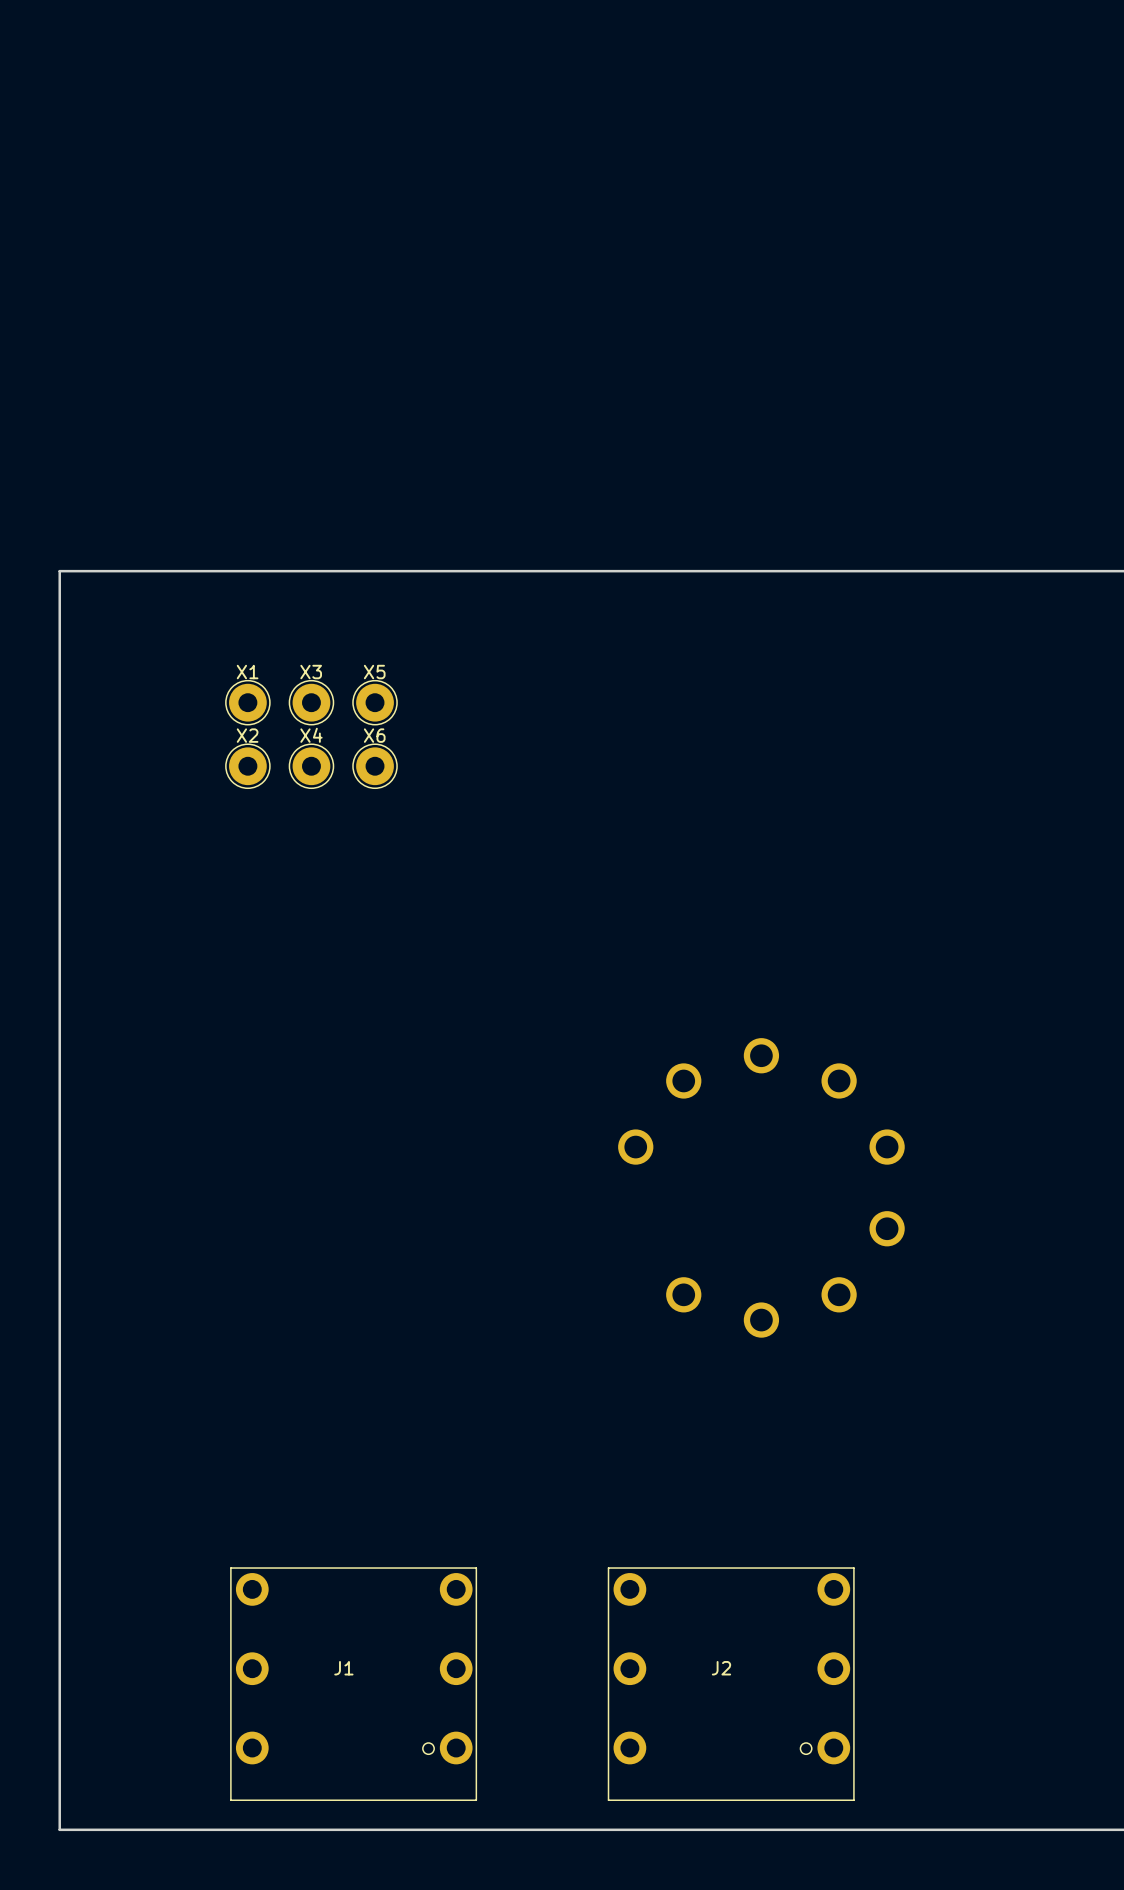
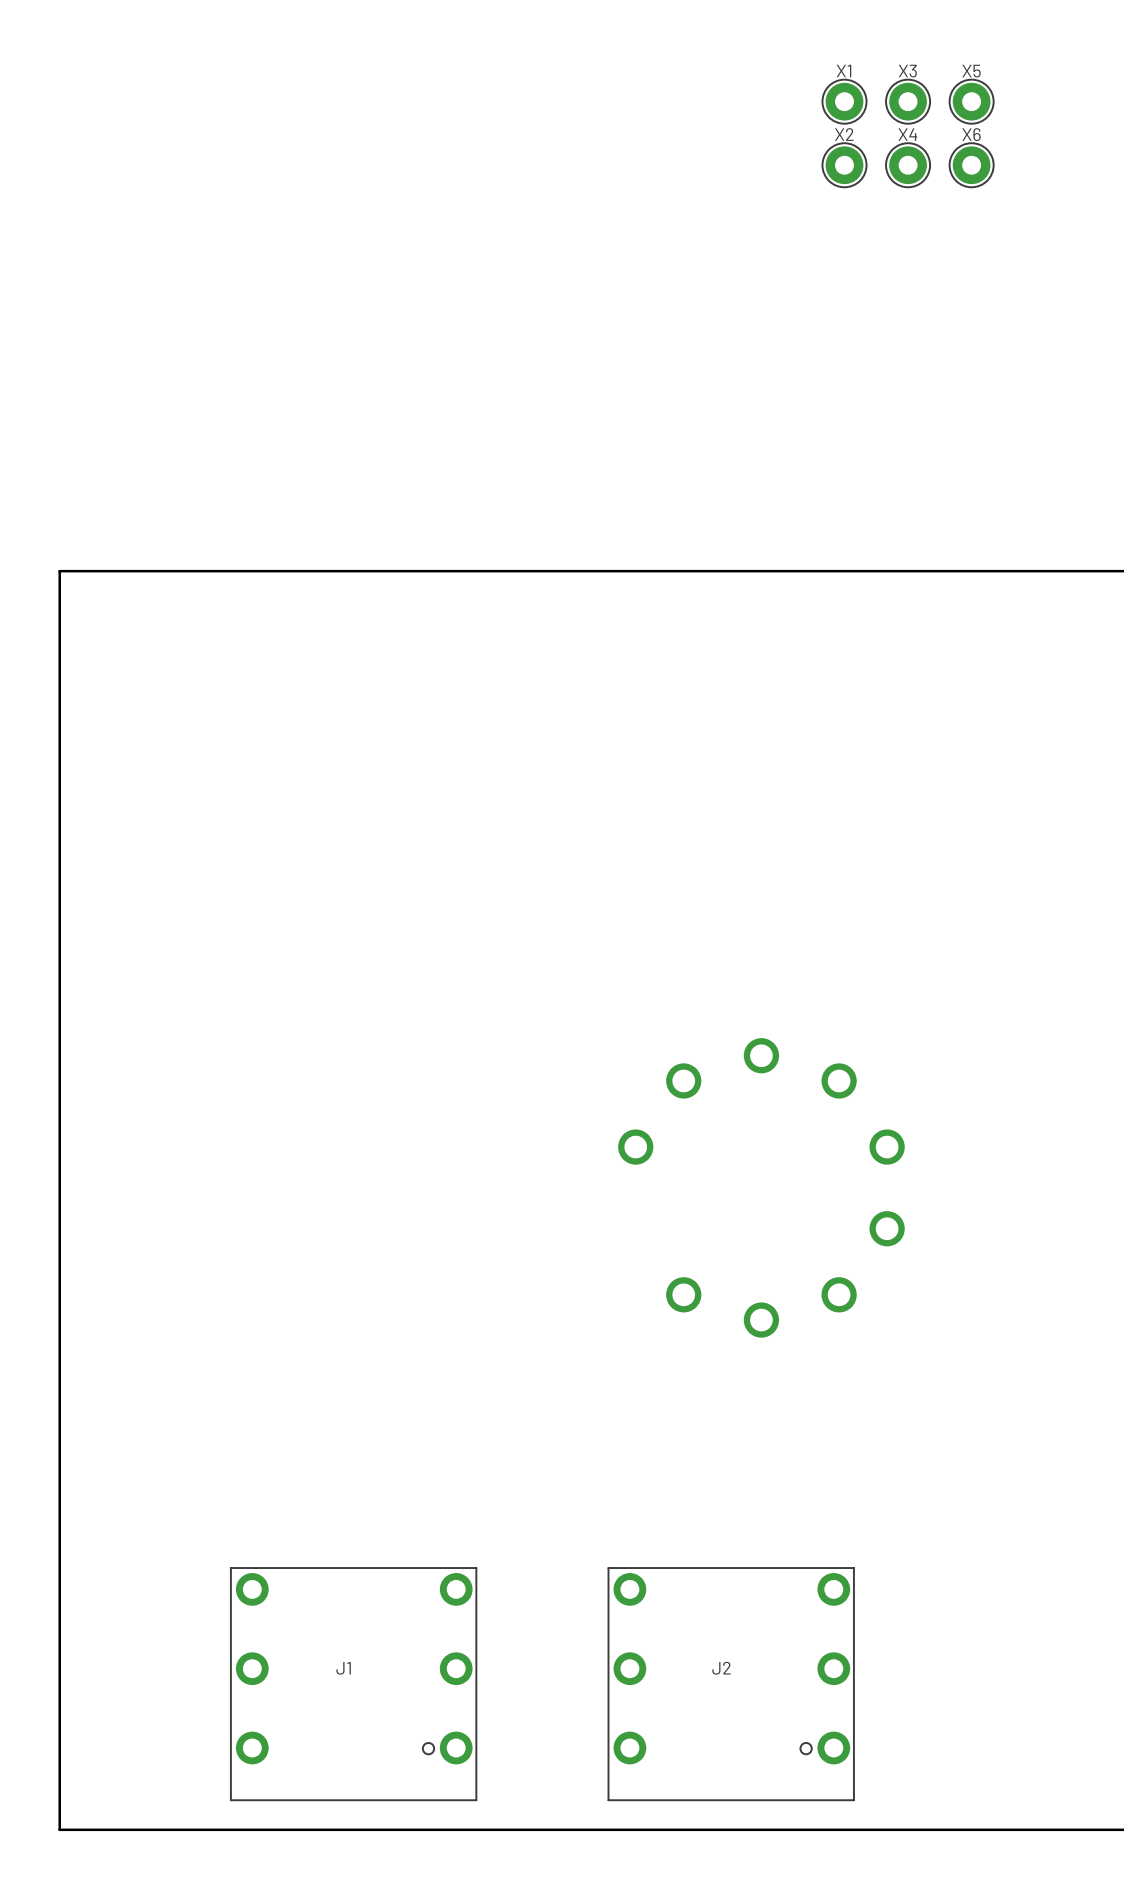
X1 position: (247, 702) -> (844, 101)
X3 position: (311, 702) -> (908, 101)
X5 position: (375, 702) -> (971, 101)
X2 position: (247, 766) -> (844, 165)
X4 position: (311, 766) -> (908, 165)
X6 position: (375, 766) -> (971, 165)

